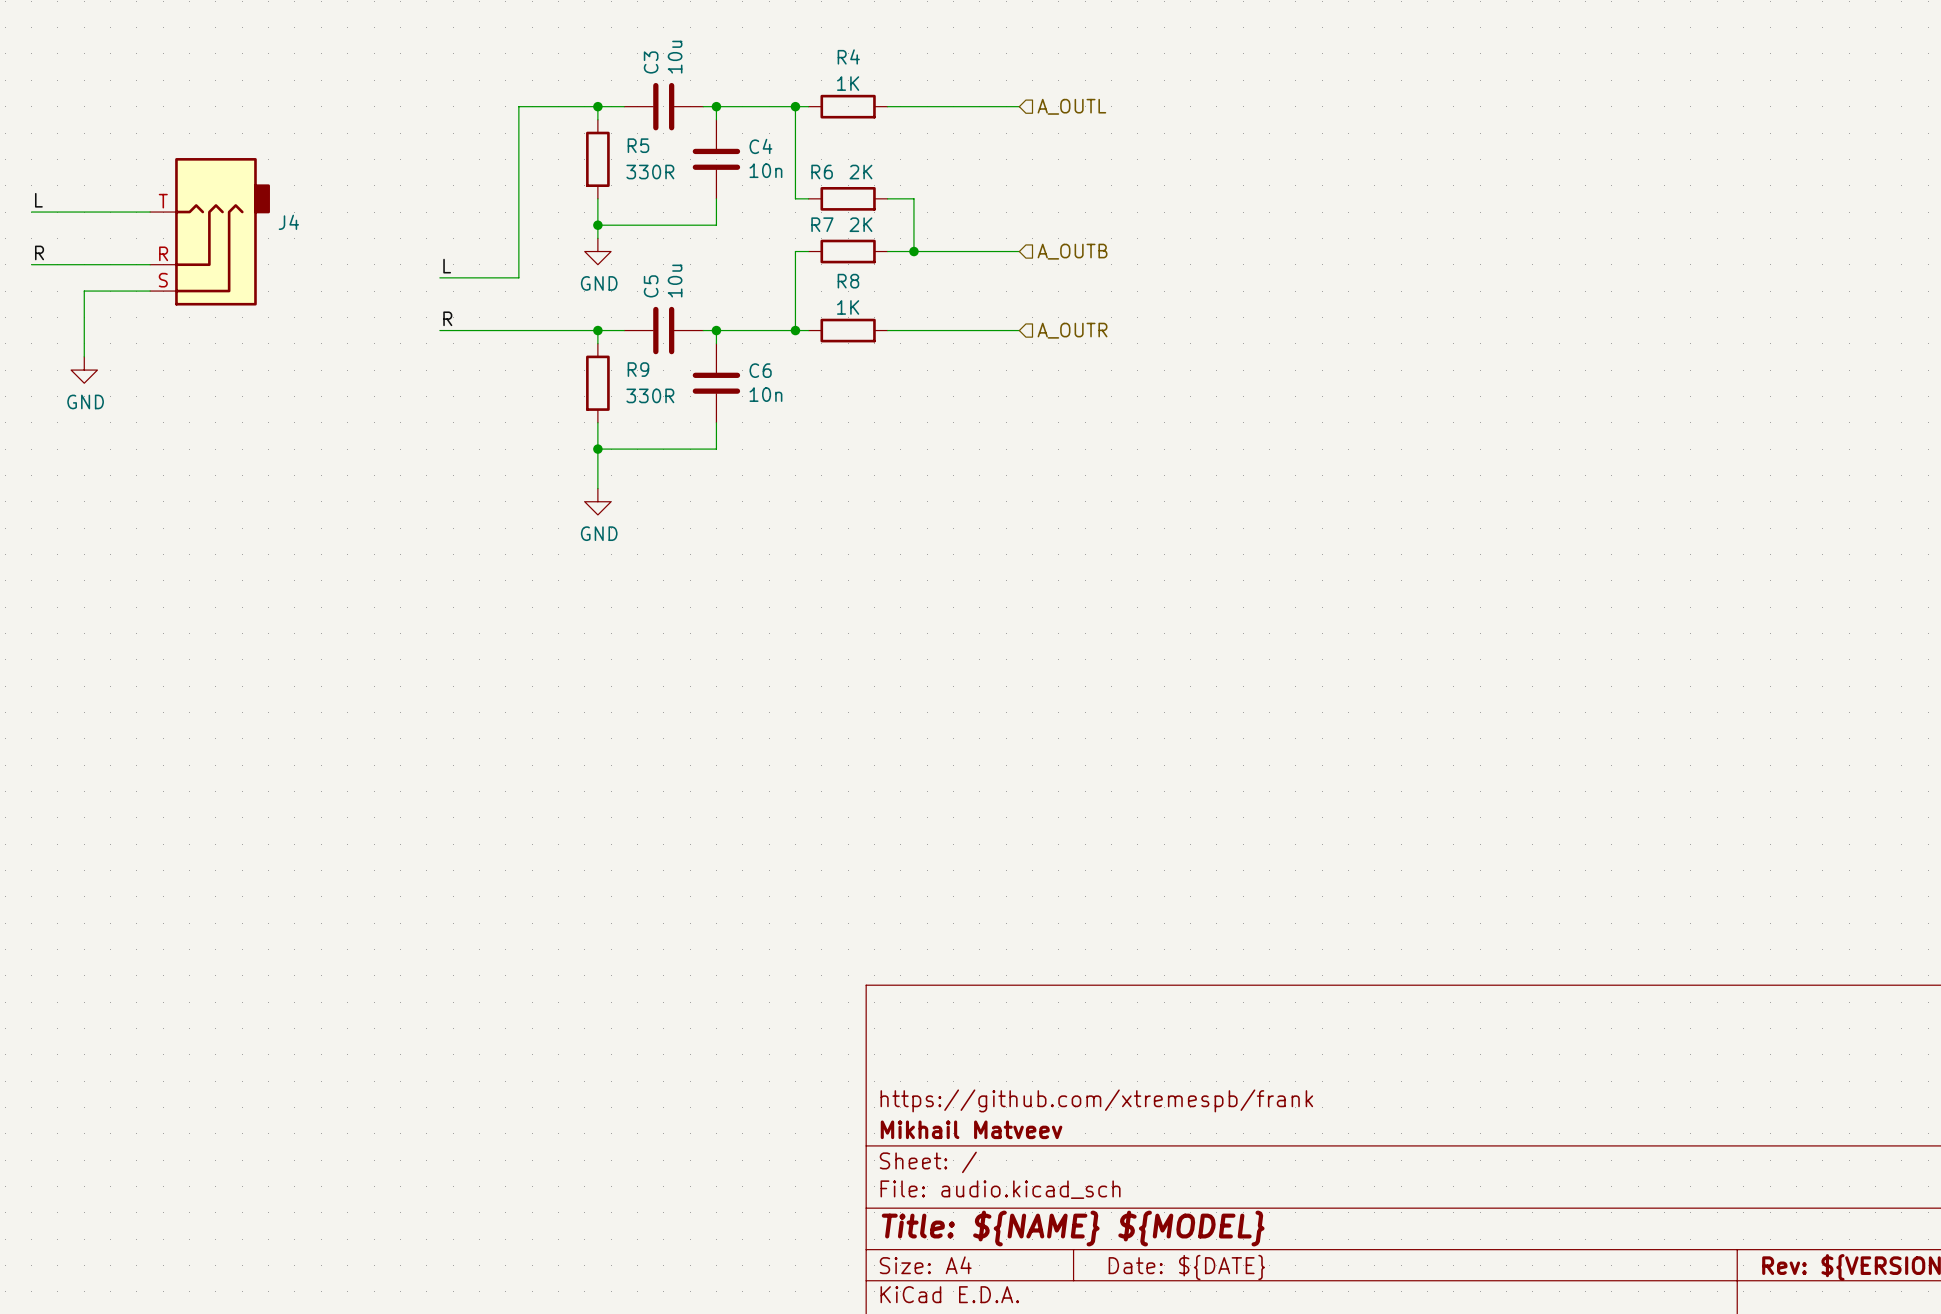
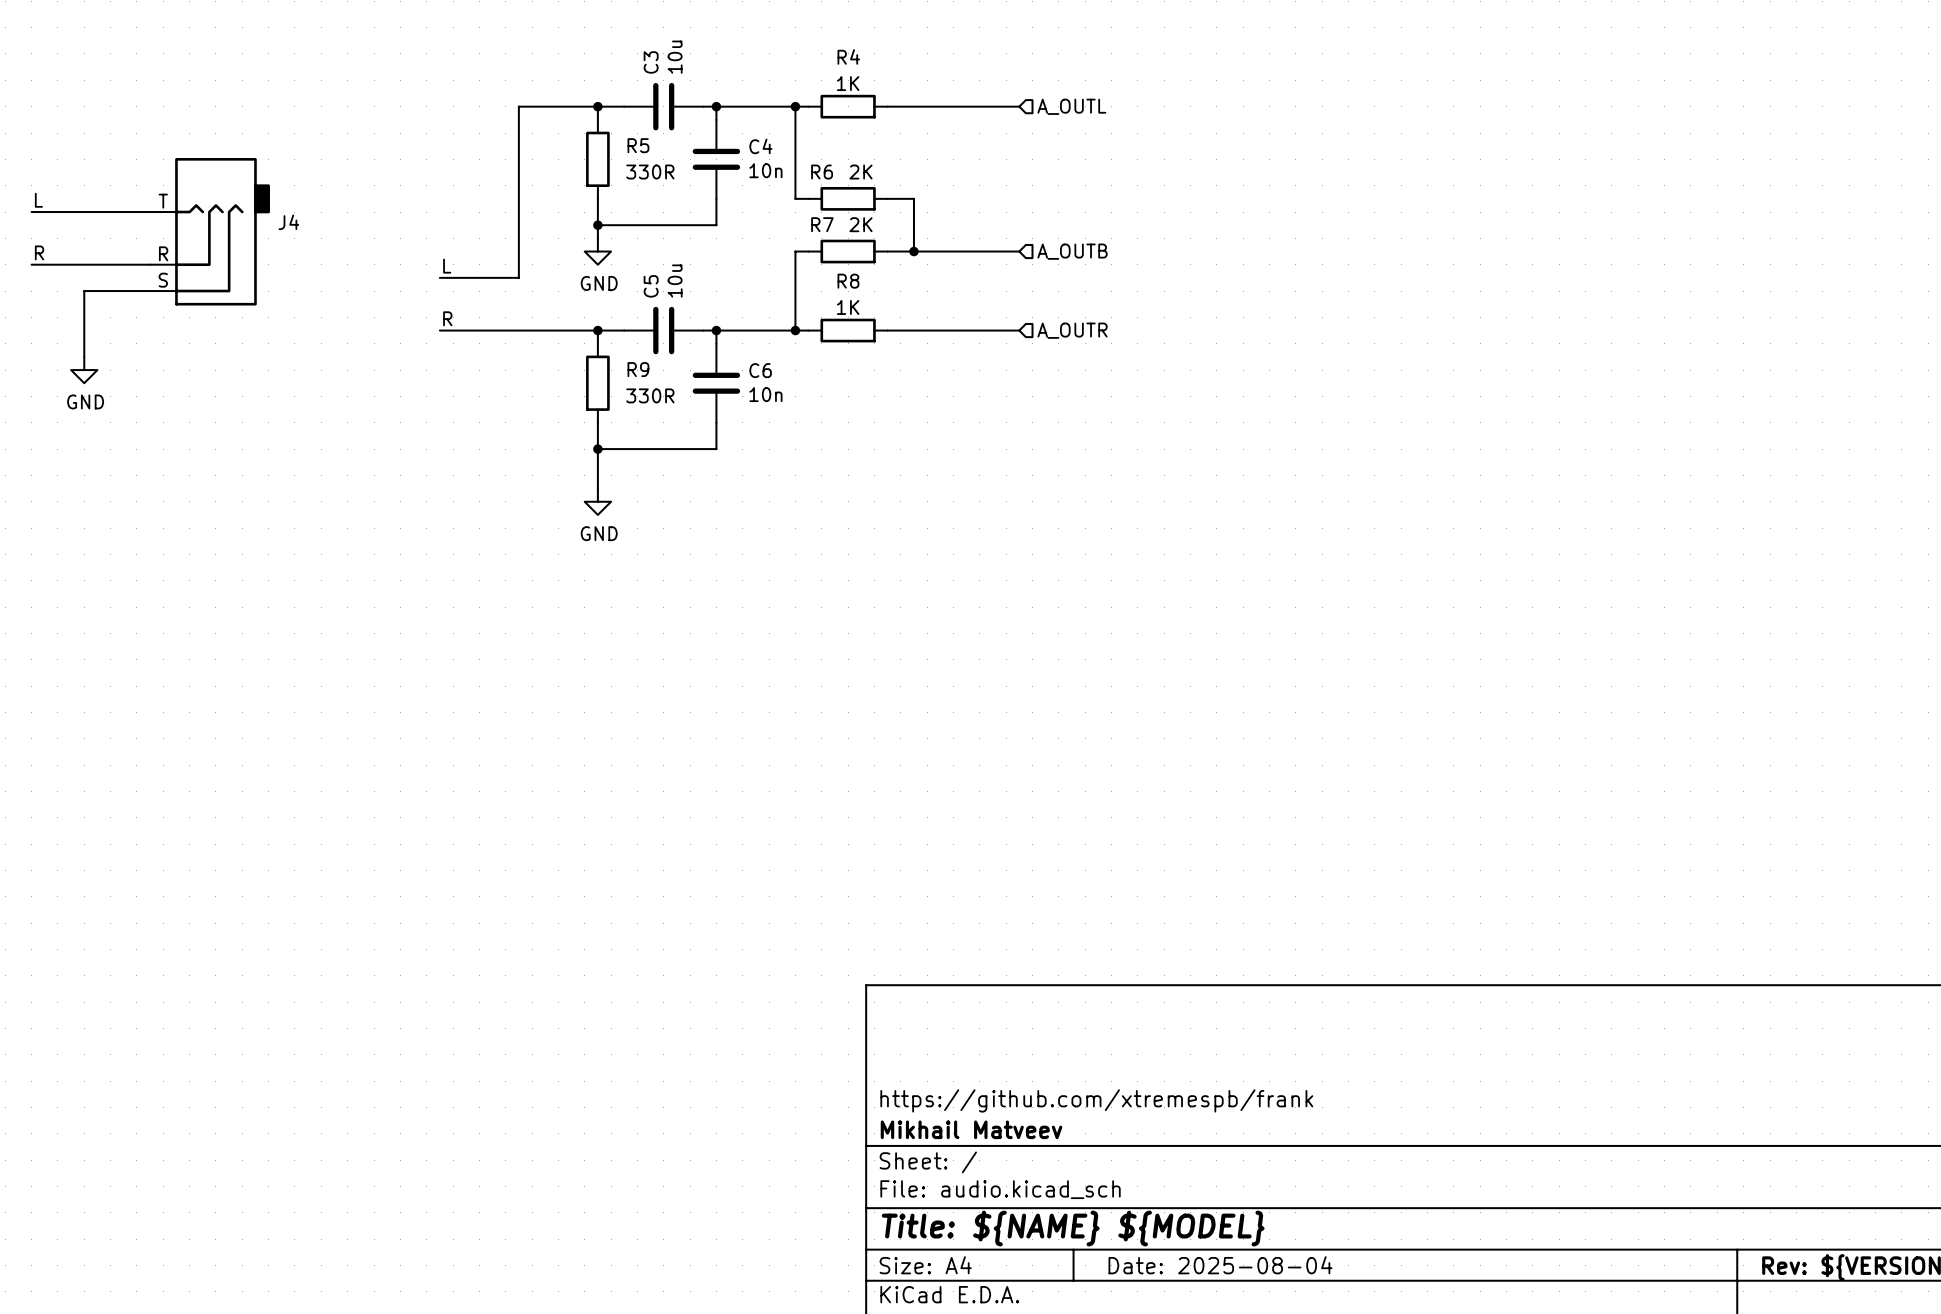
title block: Date: ${DATE} (1186, 1267) -> Date: 2025-08-04 (1220, 1265)

